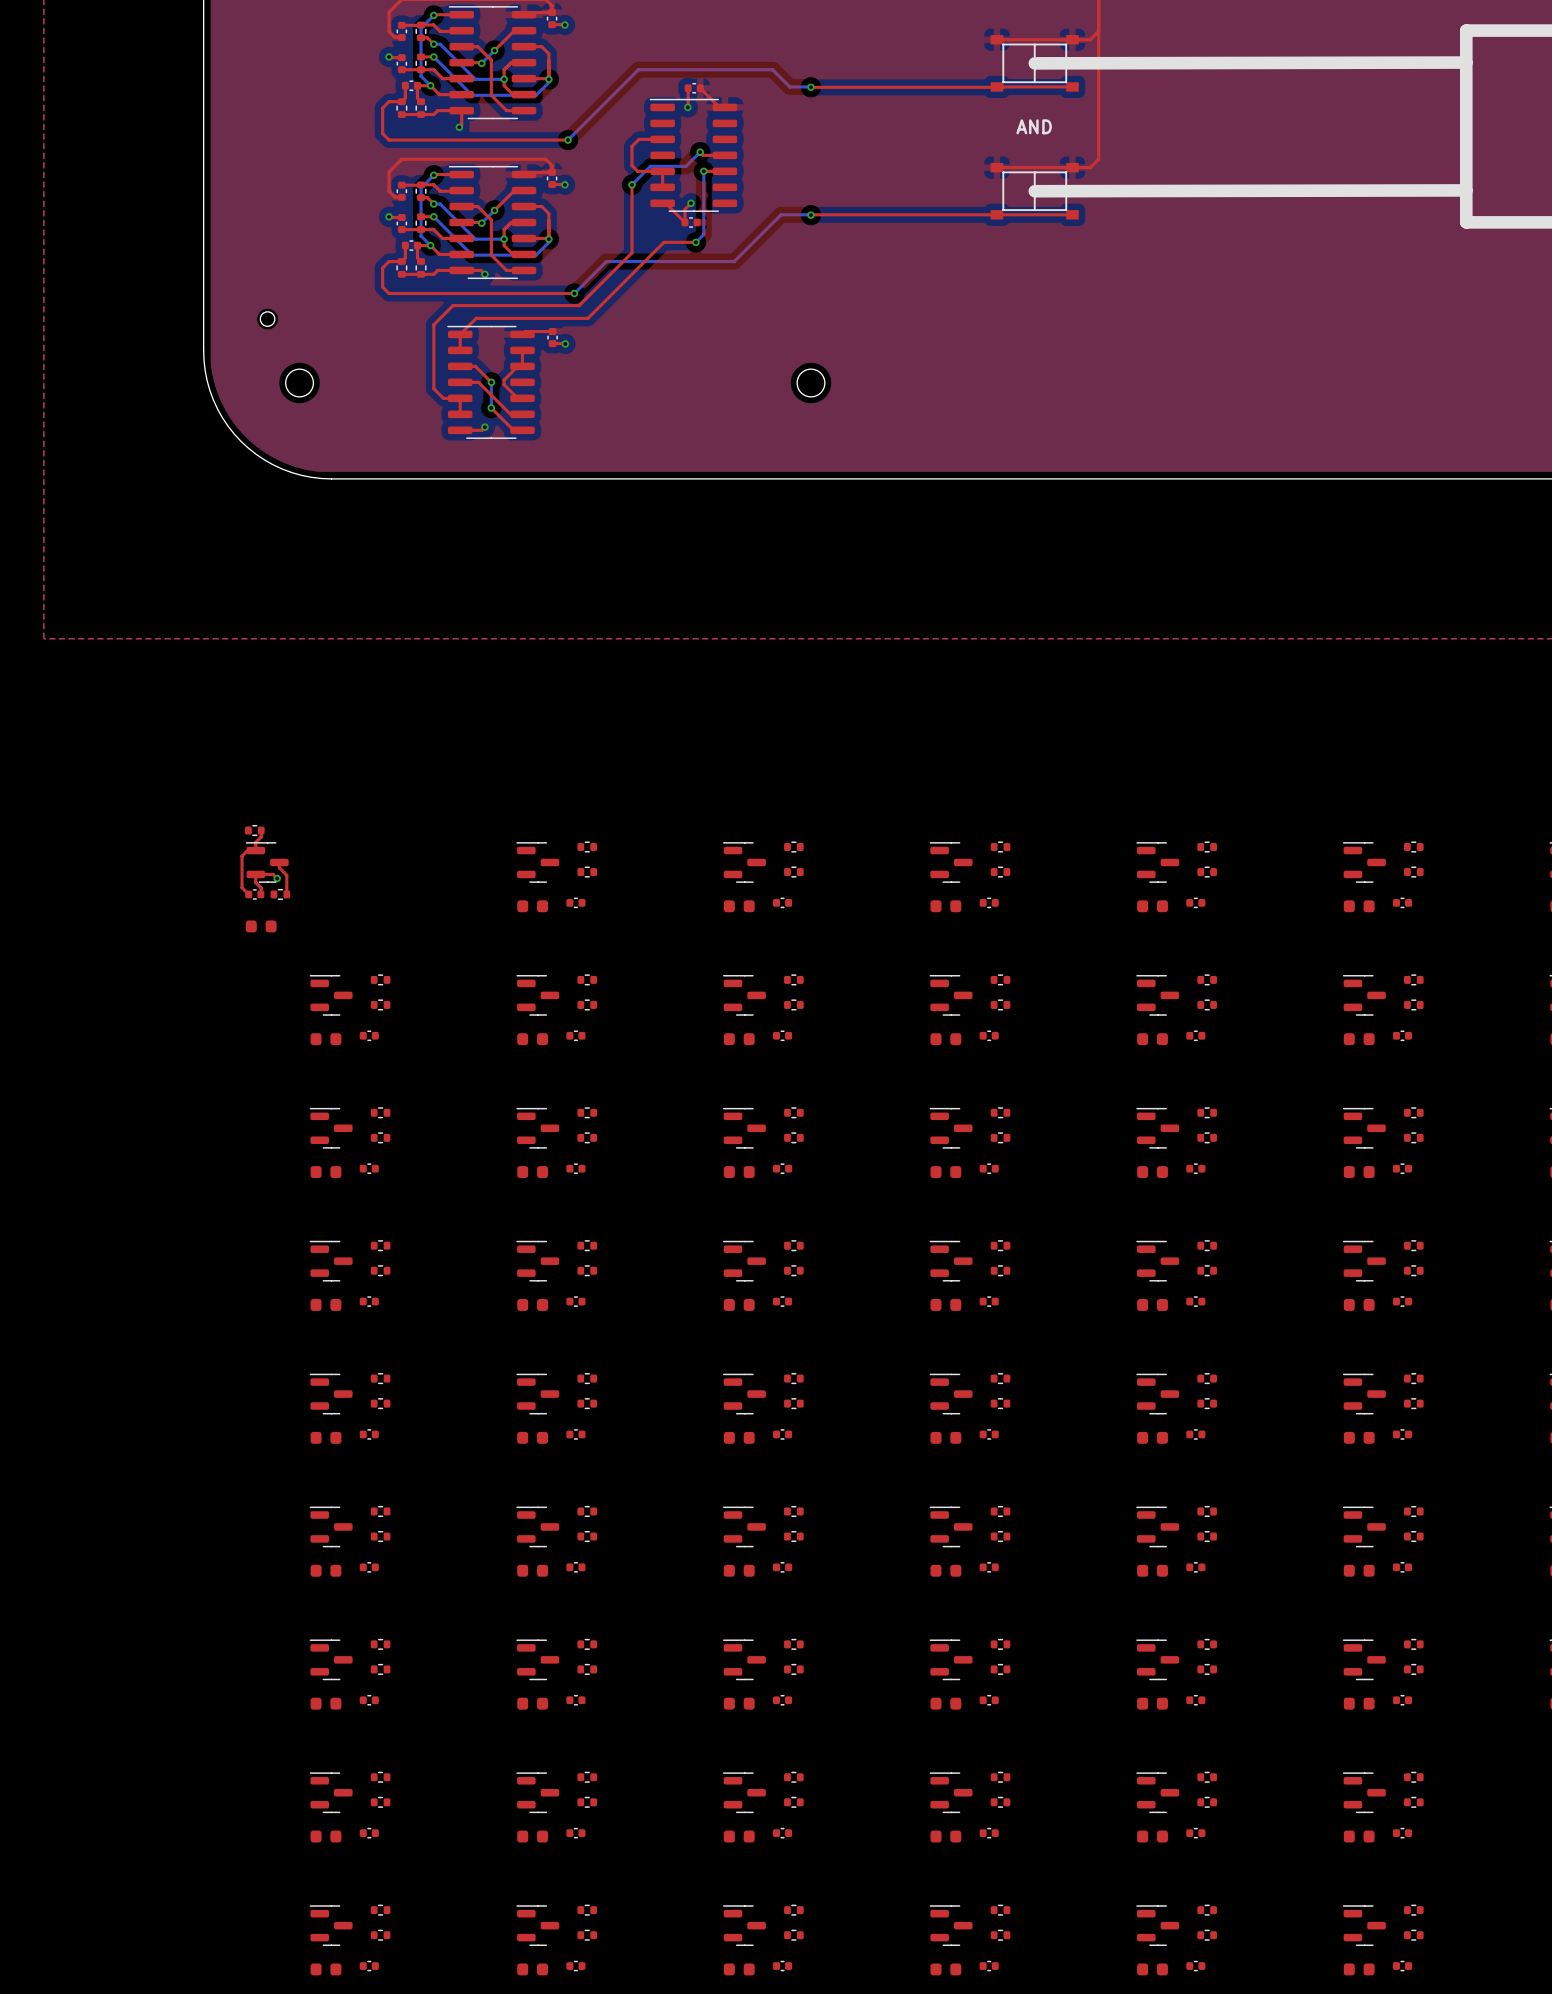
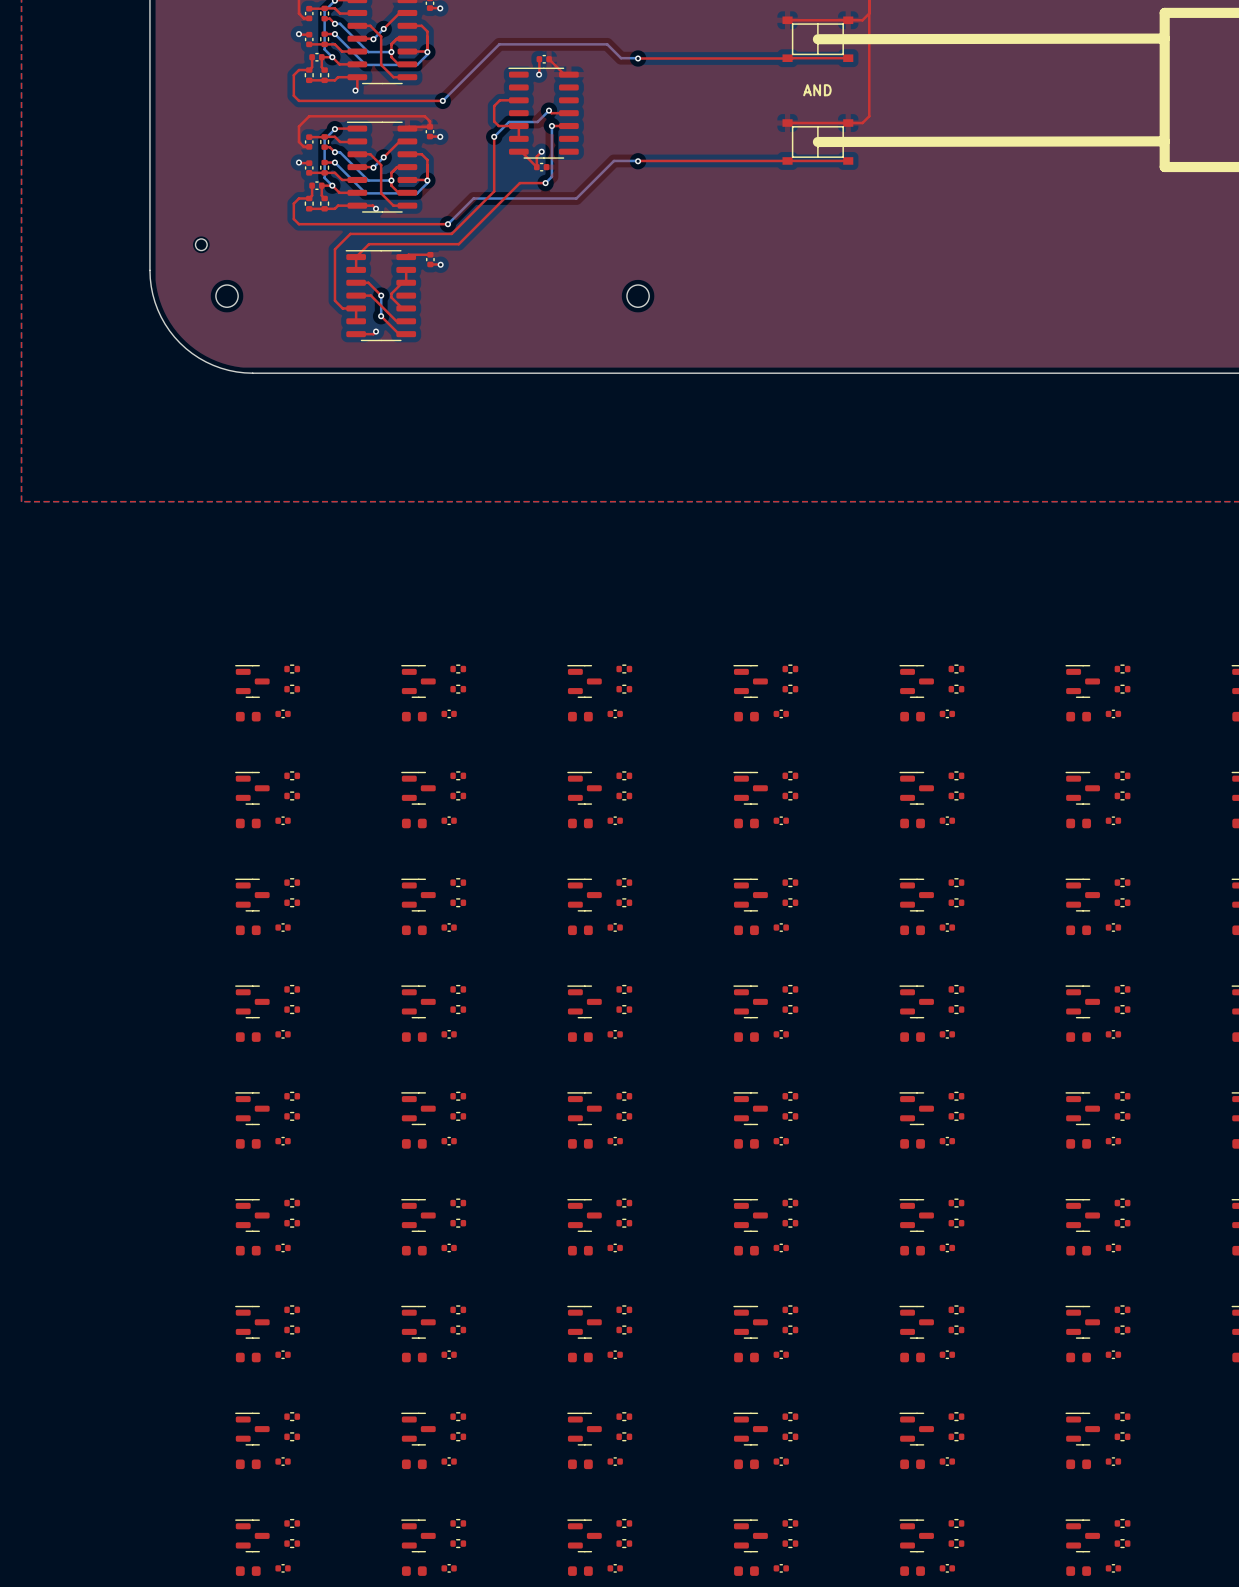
part: (254, 830) -> none
top track: (261, 830) (261, 836) (255, 842) (255, 850) (248, 849) (242, 856) (242, 887) (248, 894) -> none
part: none -> (292, 669)
part position: (267, 862) -> (252, 681)
top track: (279, 862) (279, 867) (286, 875) (286, 894) -> none
part: none -> (292, 689)
top track: (277, 878) (273, 874) (255, 874) (255, 882) (261, 888) (260, 894) -> none
via: (277, 878) -> none
part position: (254, 894) -> (283, 713)
part: (280, 894) -> none
part position: (261, 926) -> (248, 716)

